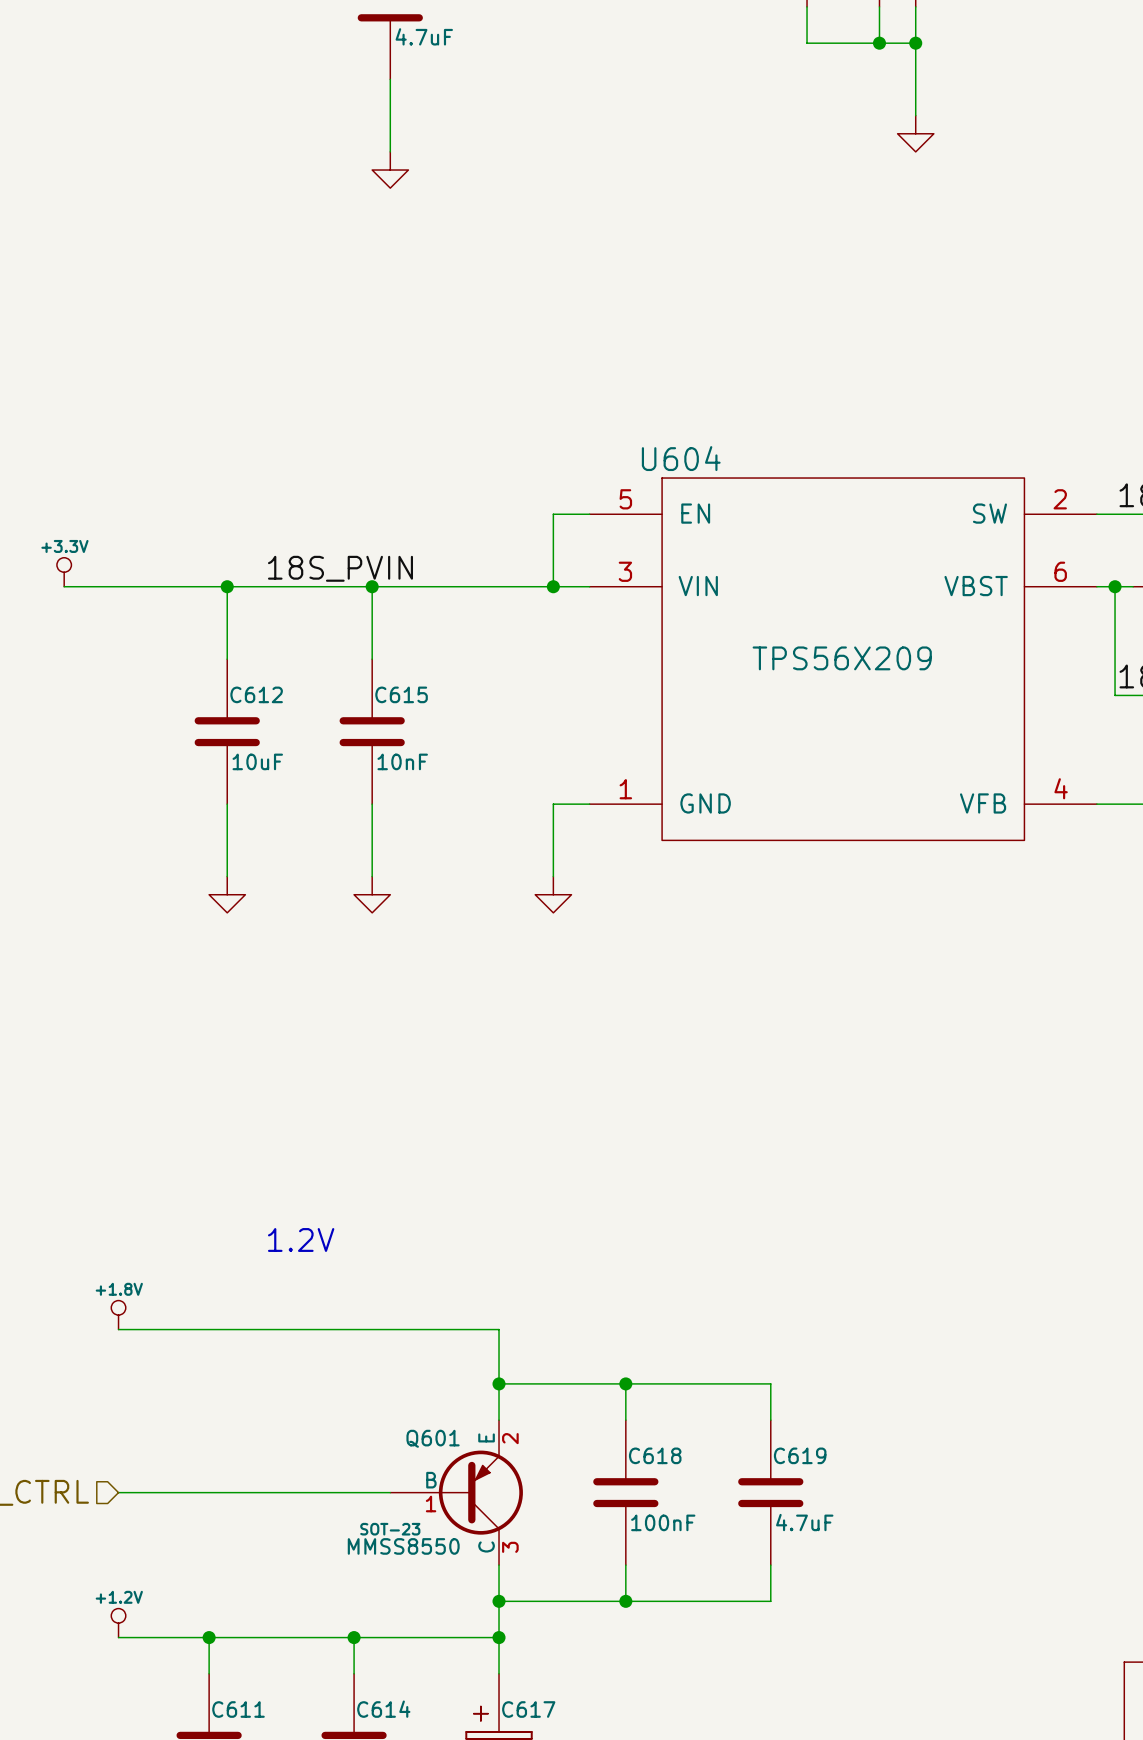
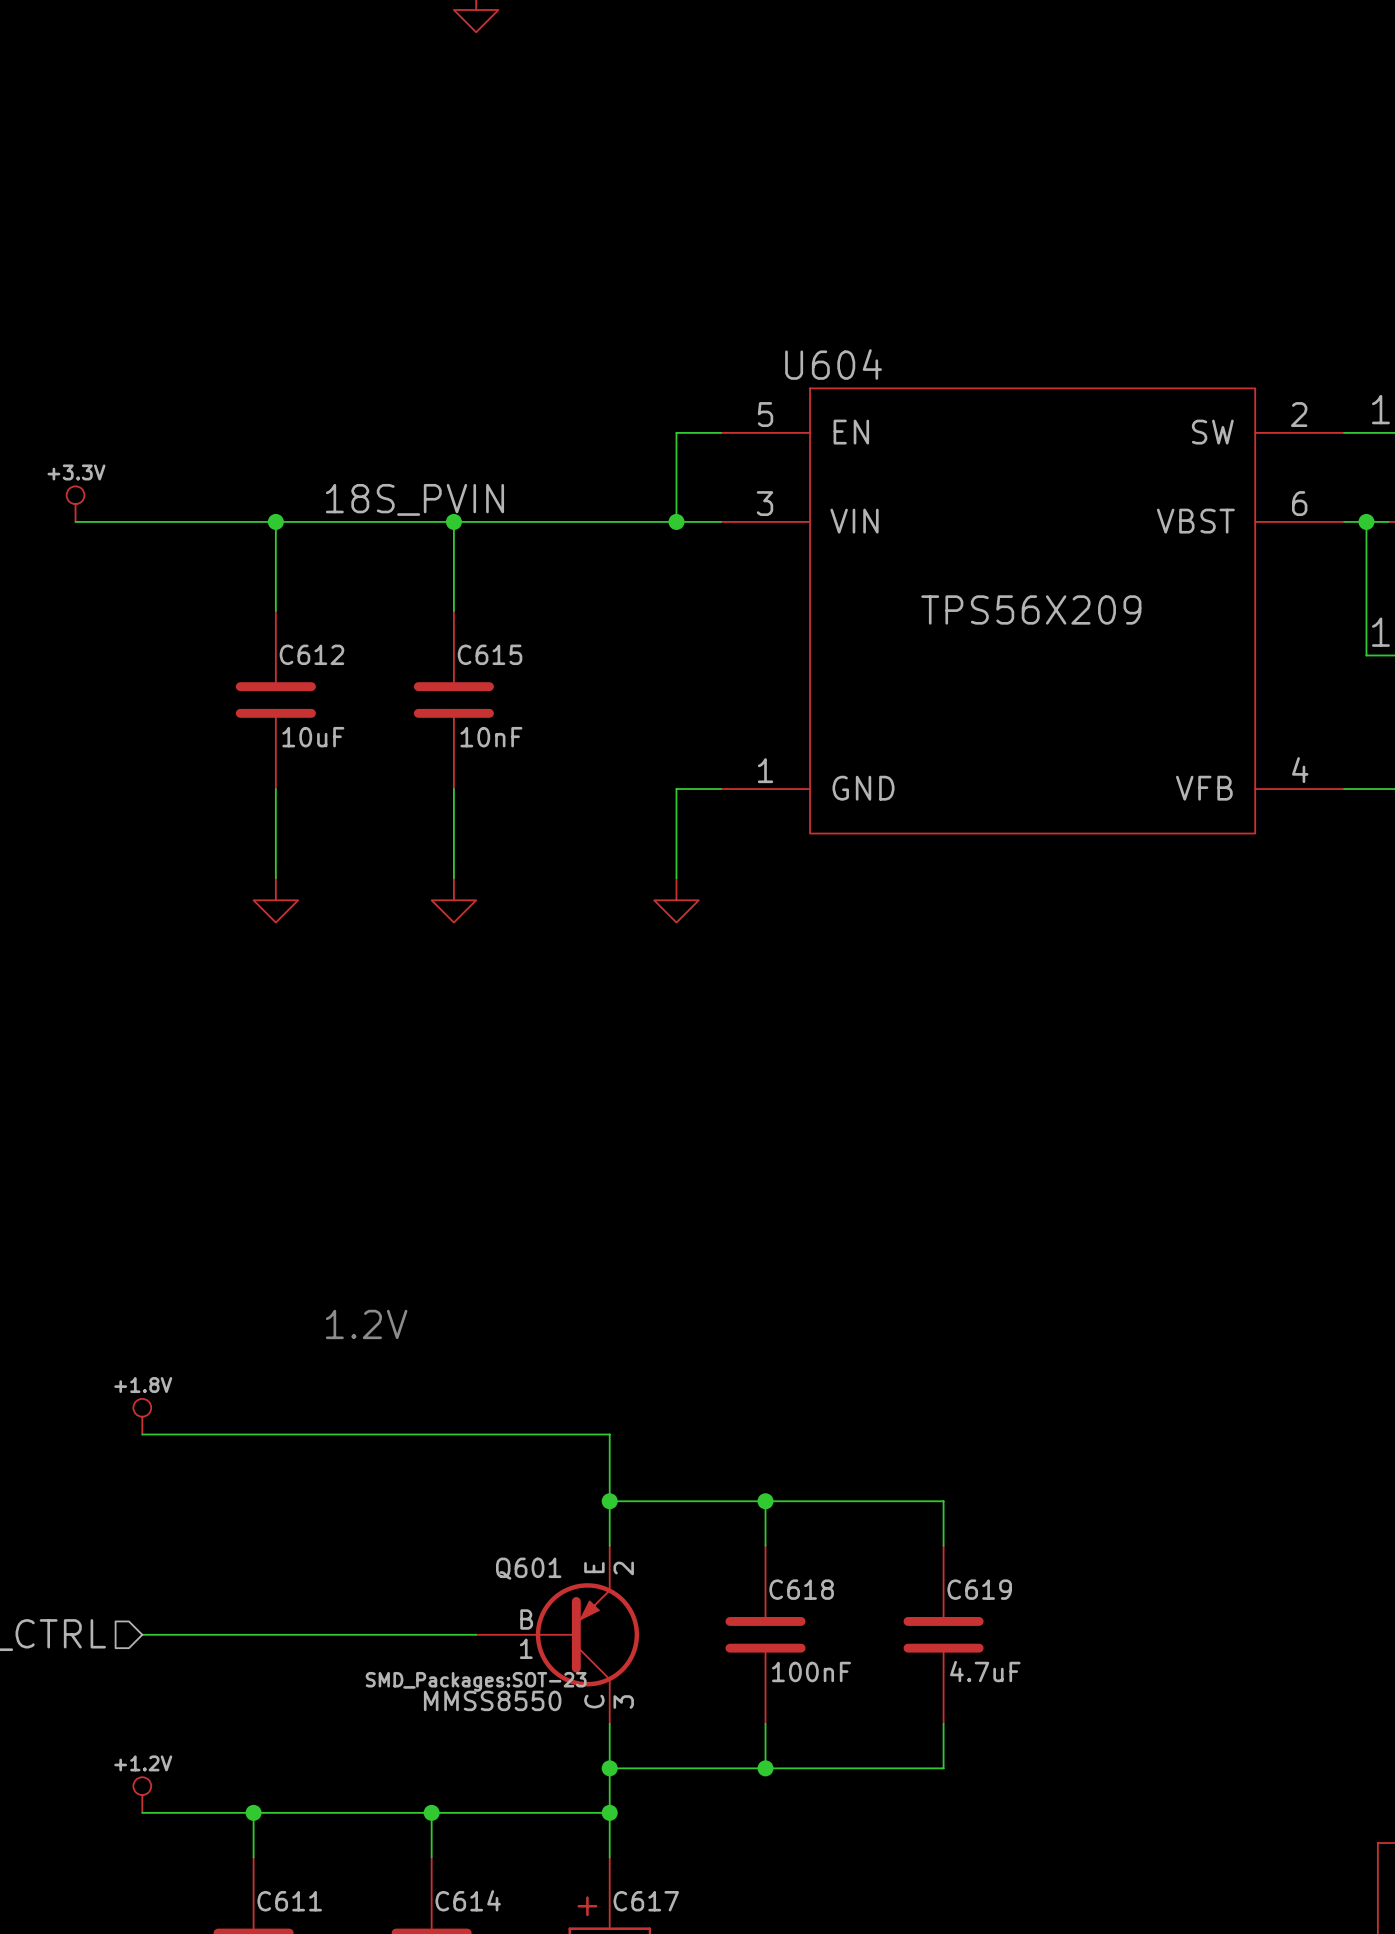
Q601 text: SOT-23 (390, 1529) -> SMD_Packages:SOT-23 (476, 1681)

